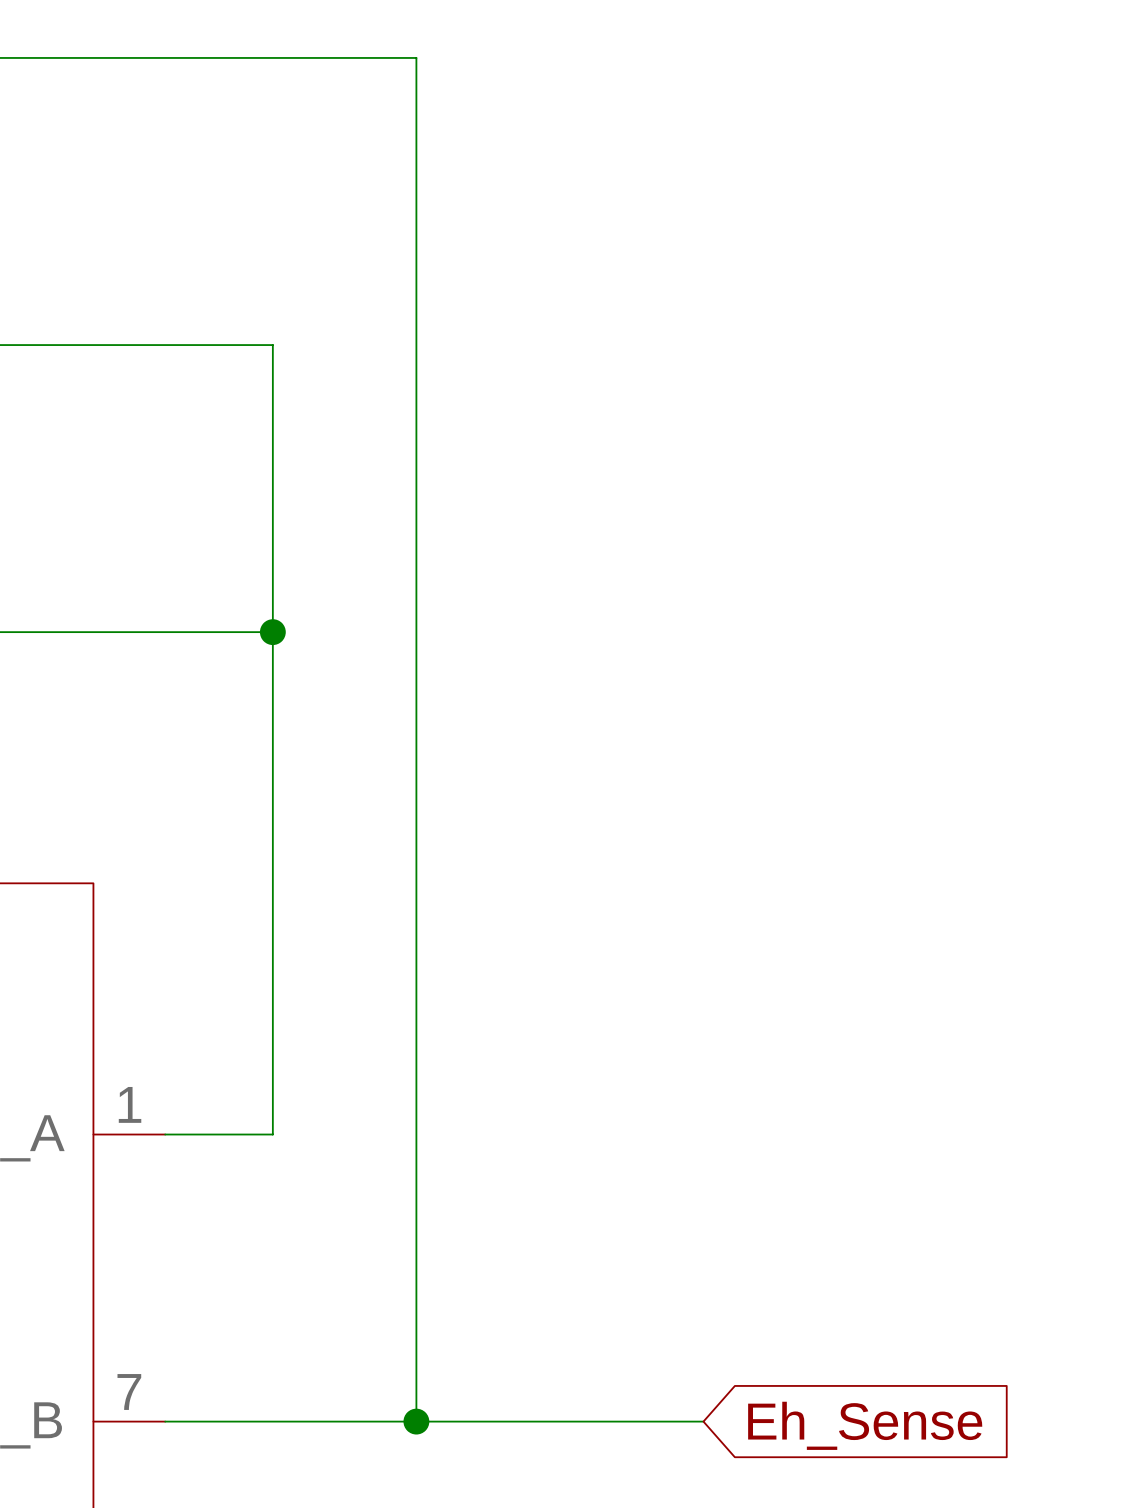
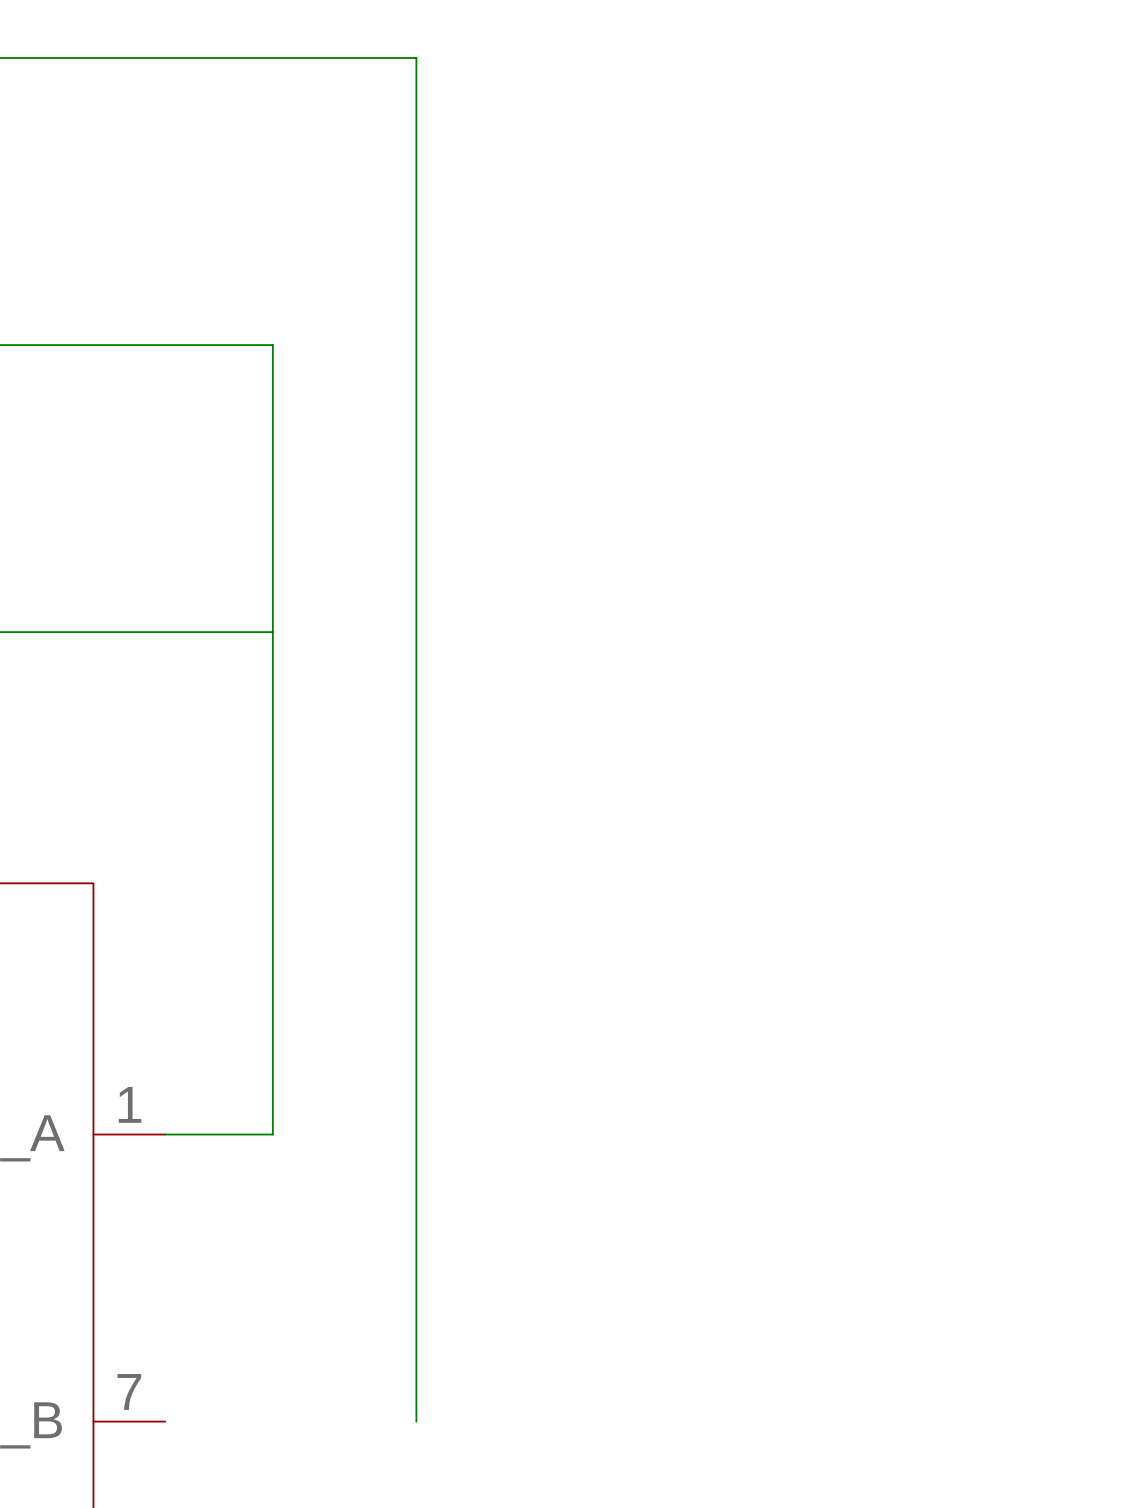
junction: (272, 632) -> none
wire: (165, 1421) (703, 1421) -> none
junction: (416, 1421) -> none
global label: Eh_Sense (865, 1425) -> none

